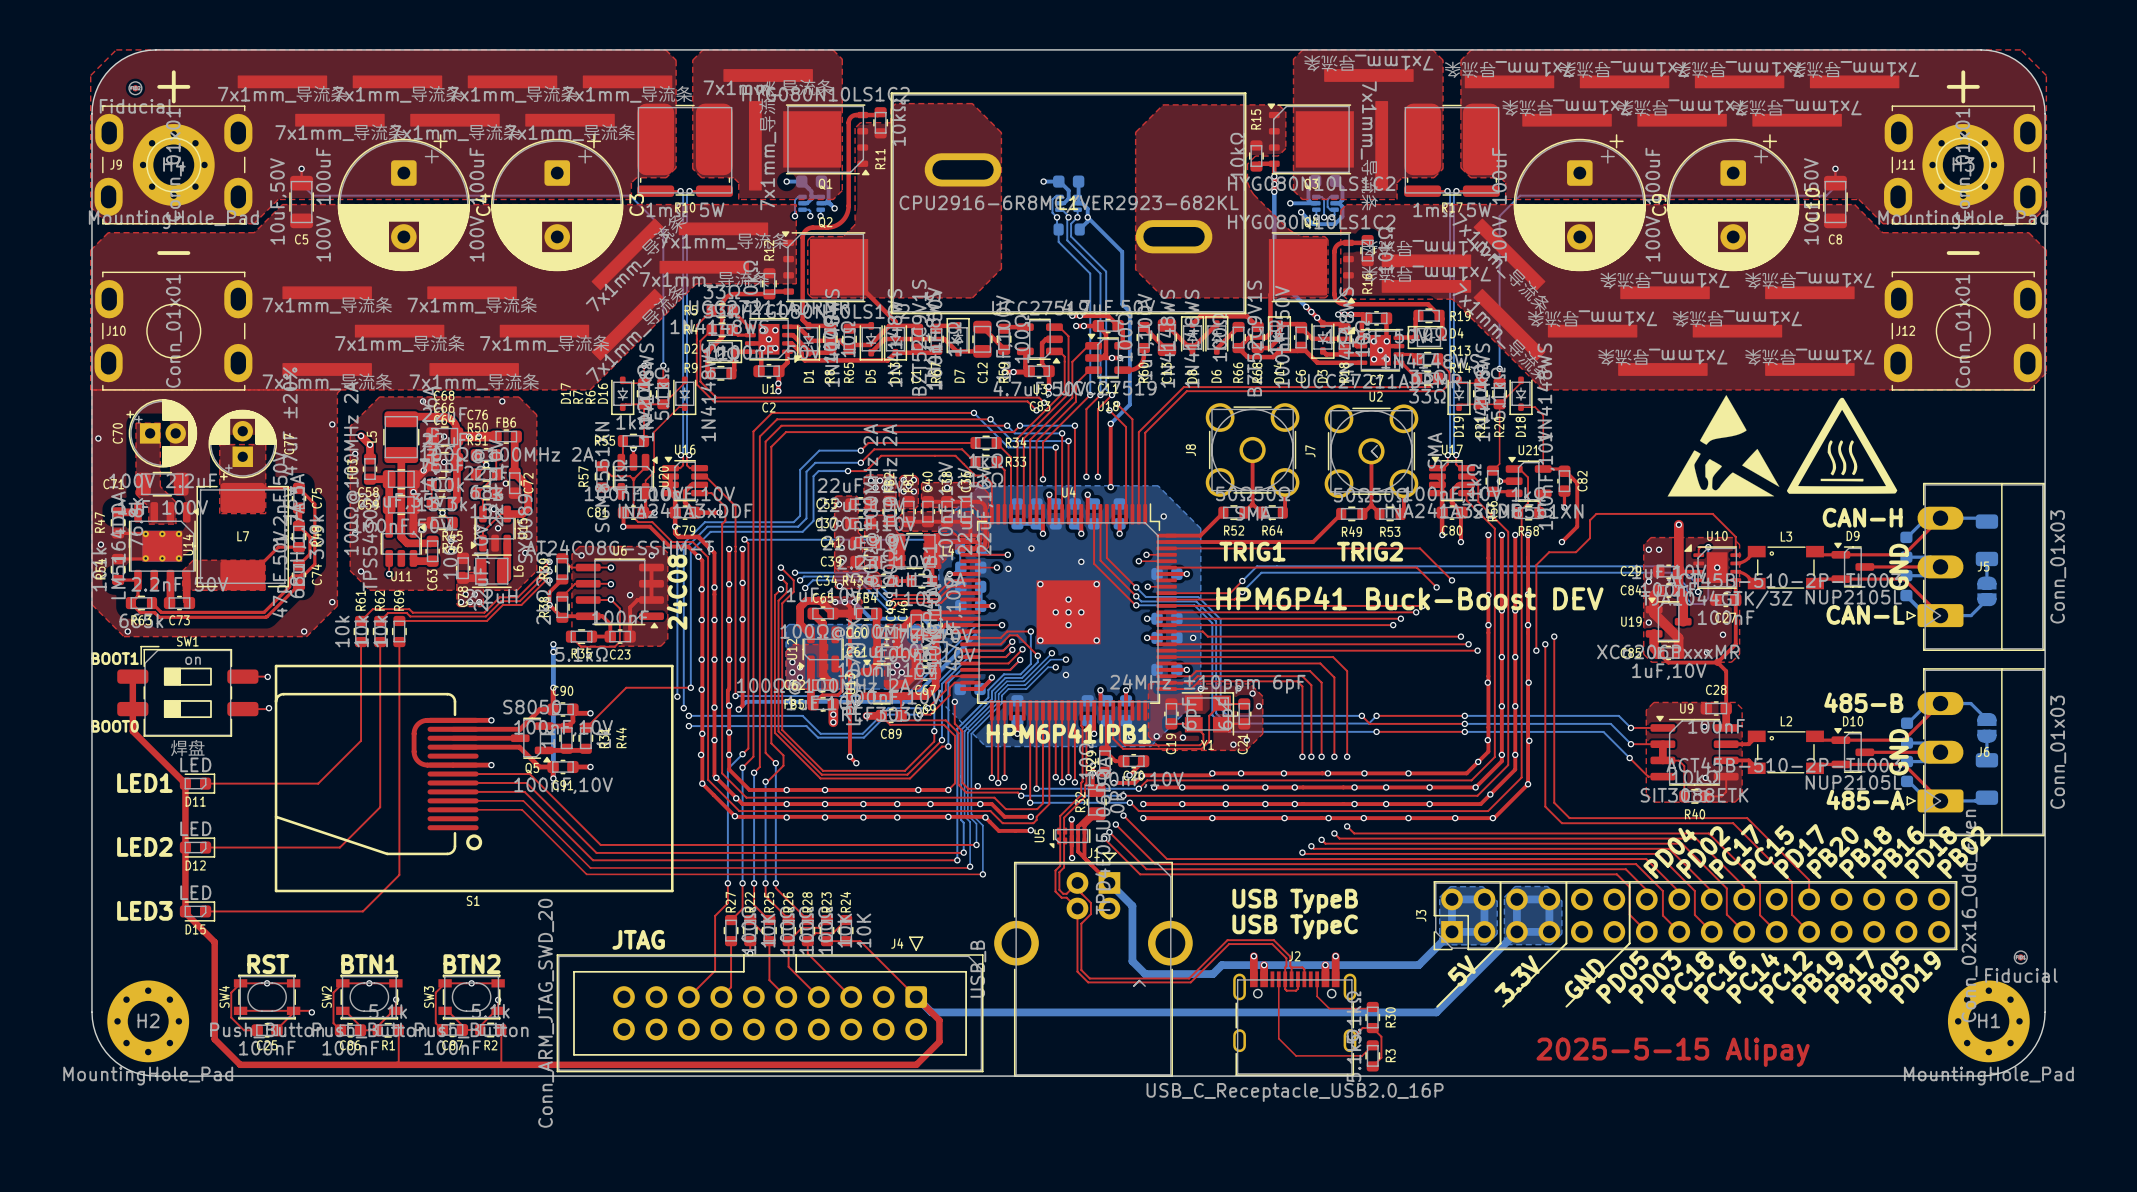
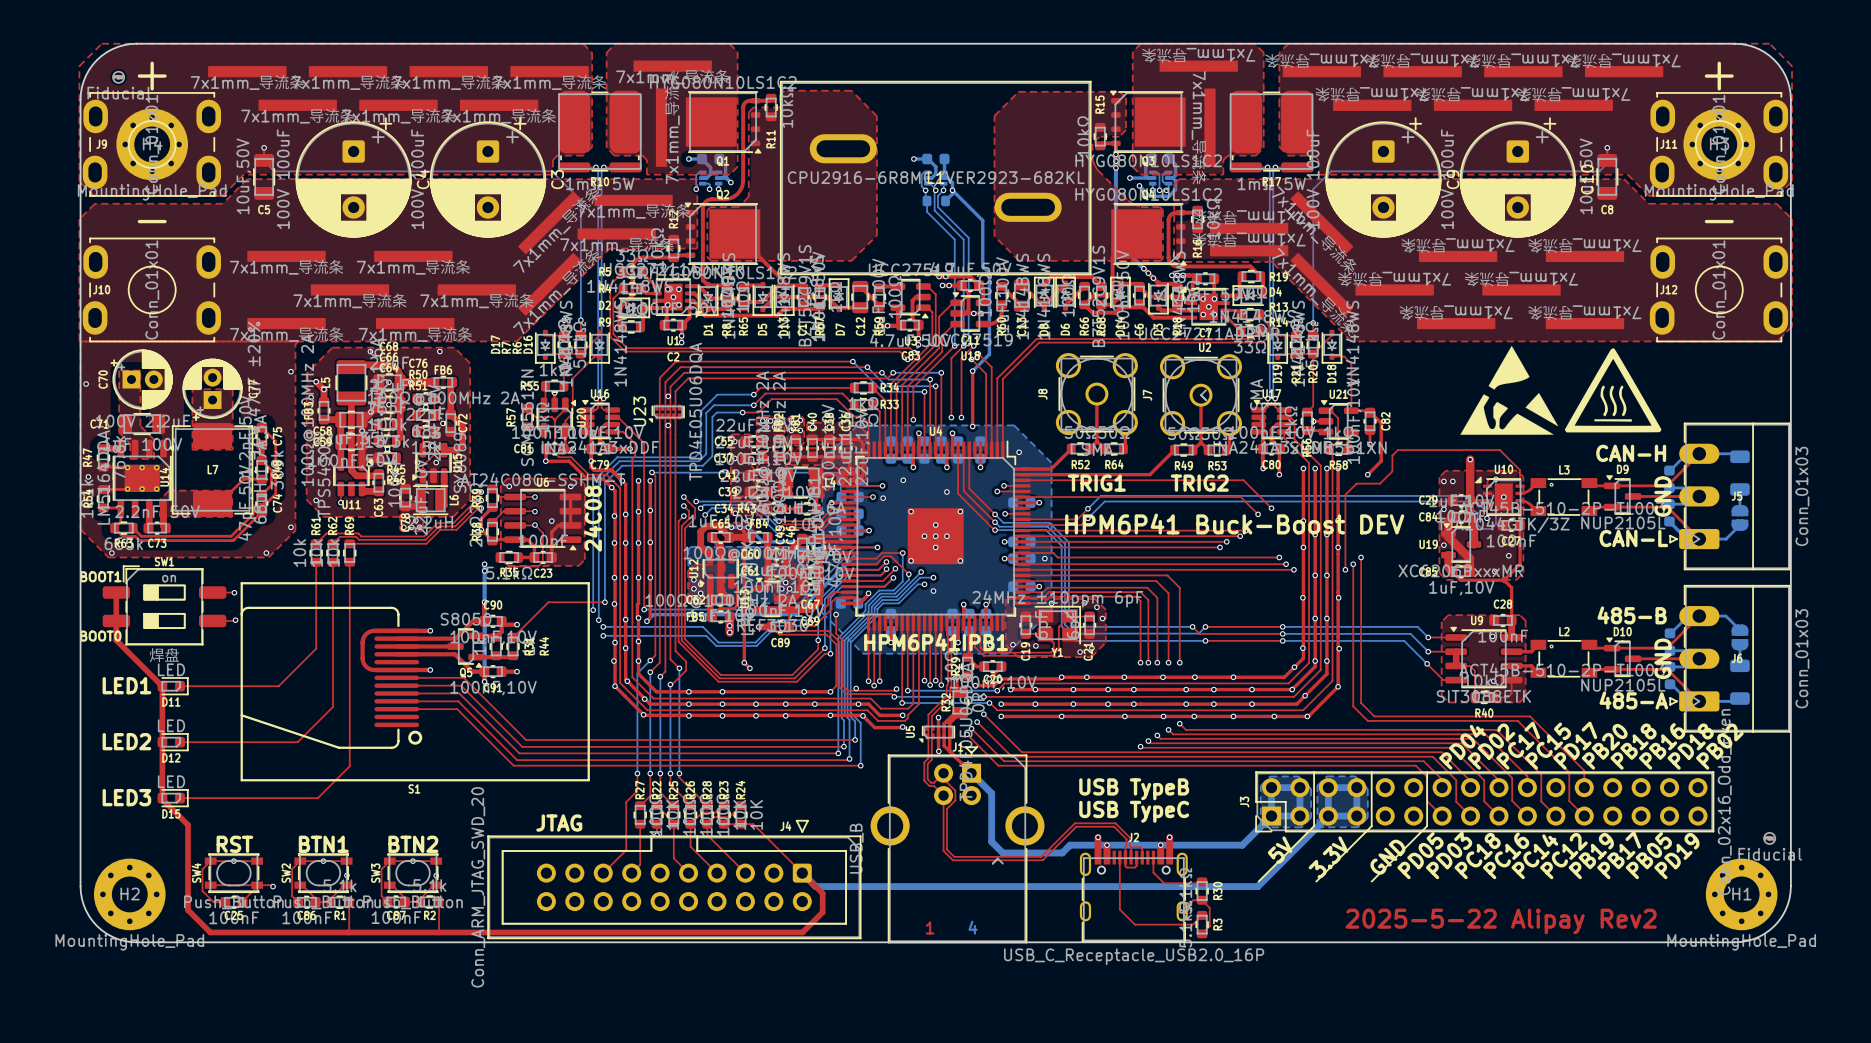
via: none -> (668, 396)
U23: none -> TPD4E05U06DQA (666, 413)
via: none -> (668, 425)
drawing: none -> [925, 920, 978, 935]
text: 2025-5-15 Alipay (1673, 1052) -> 2025-5-22 Alipay Rev2 (1501, 921)

